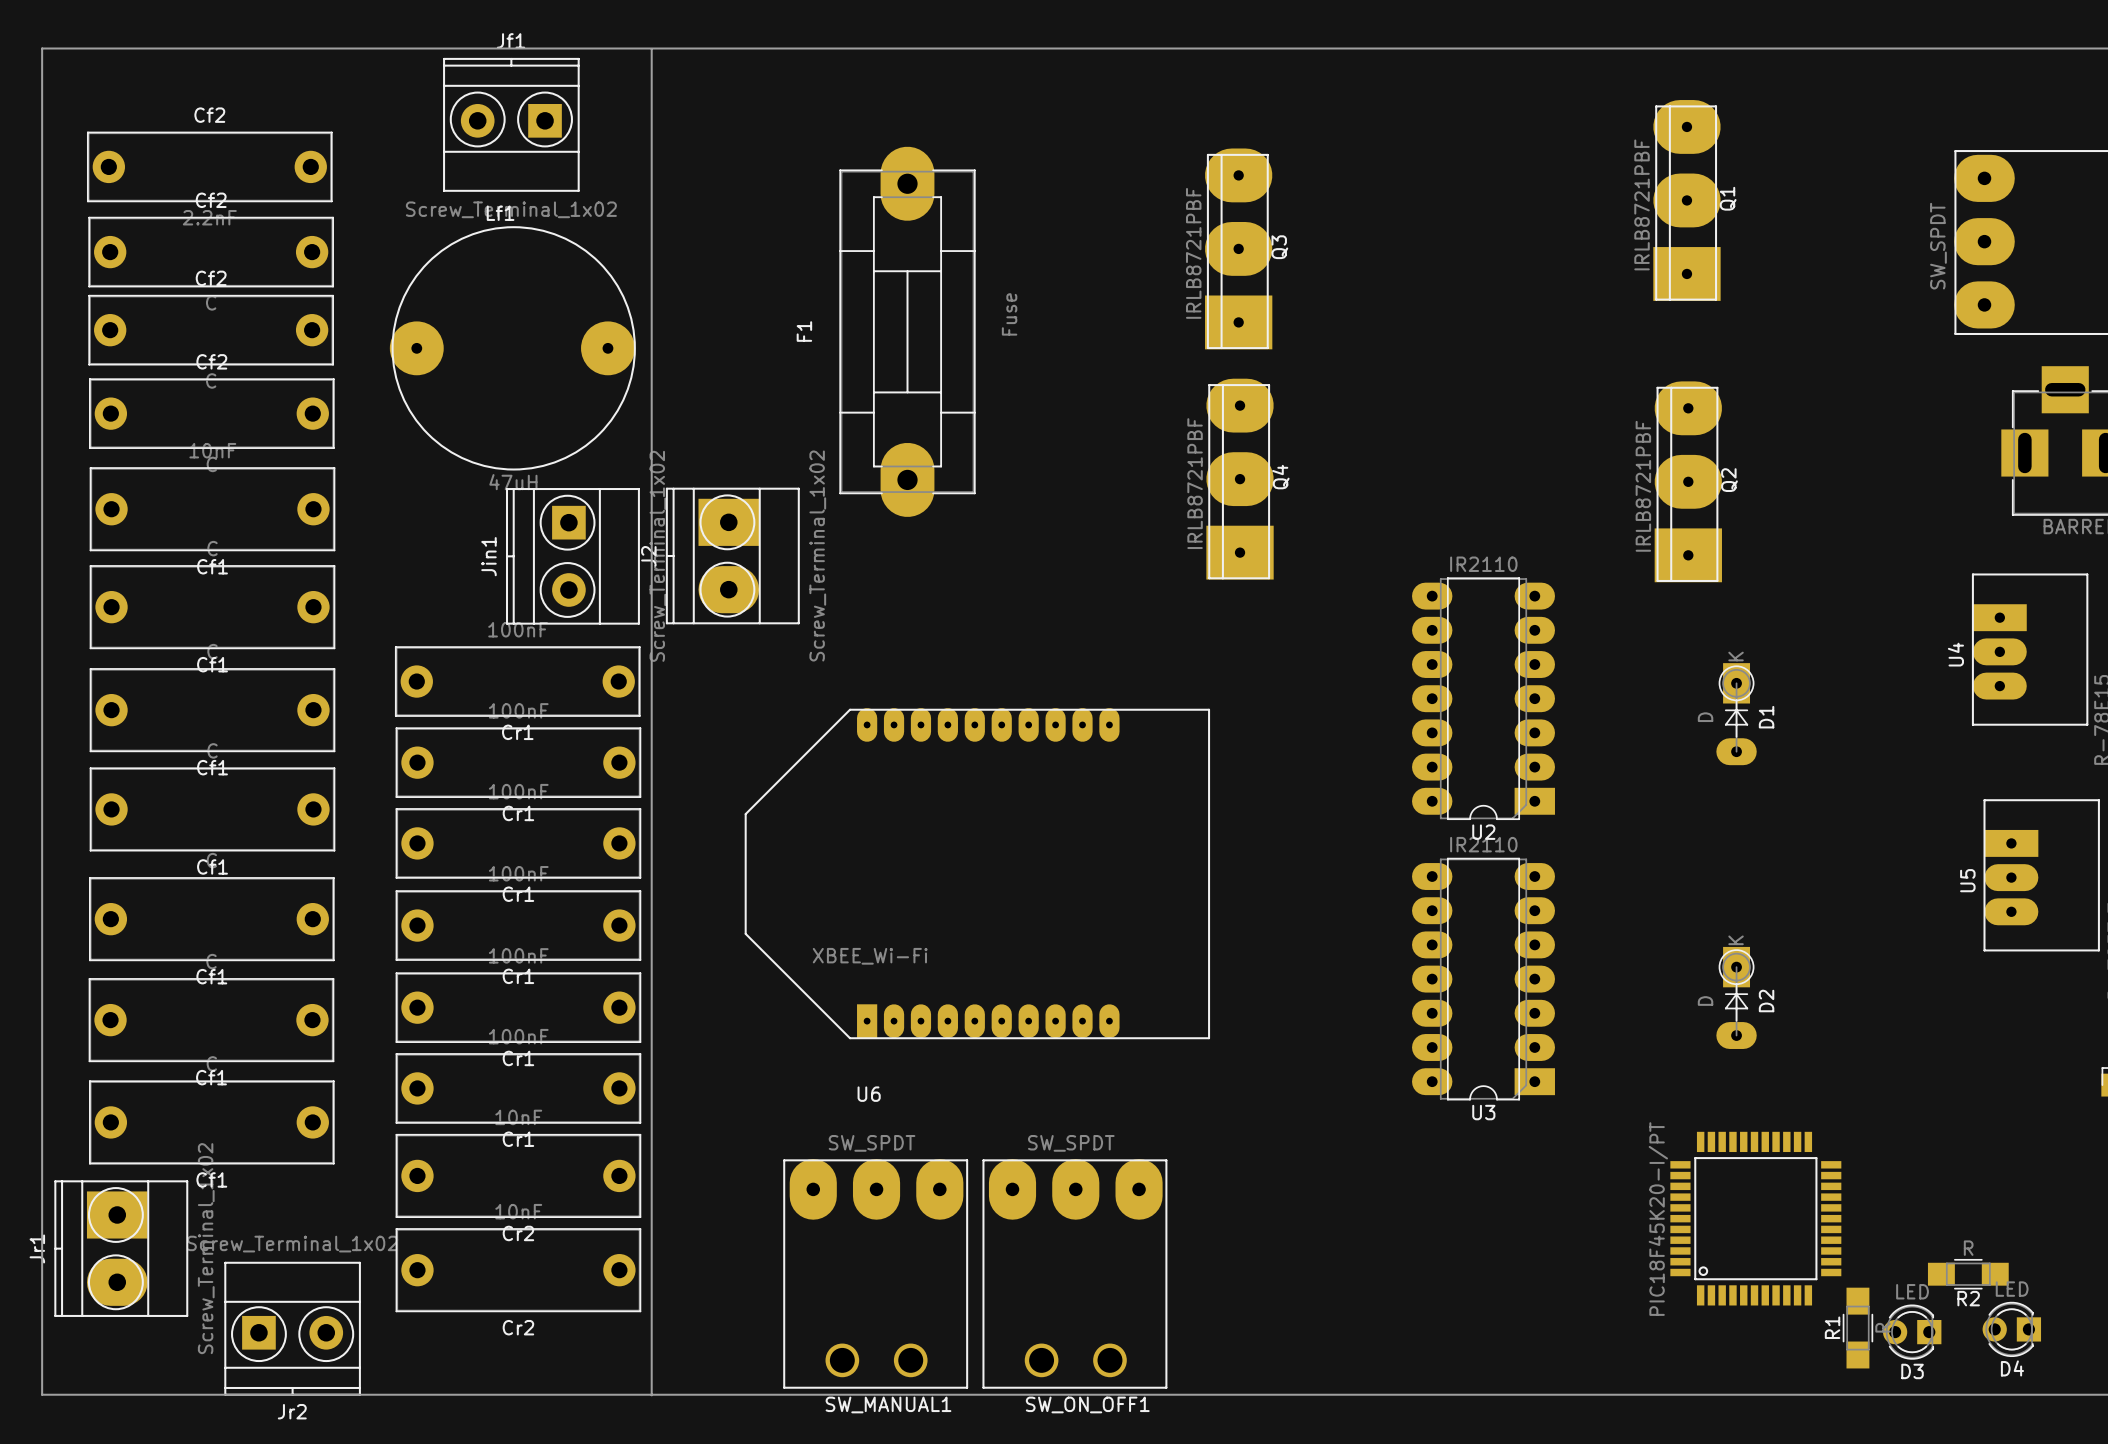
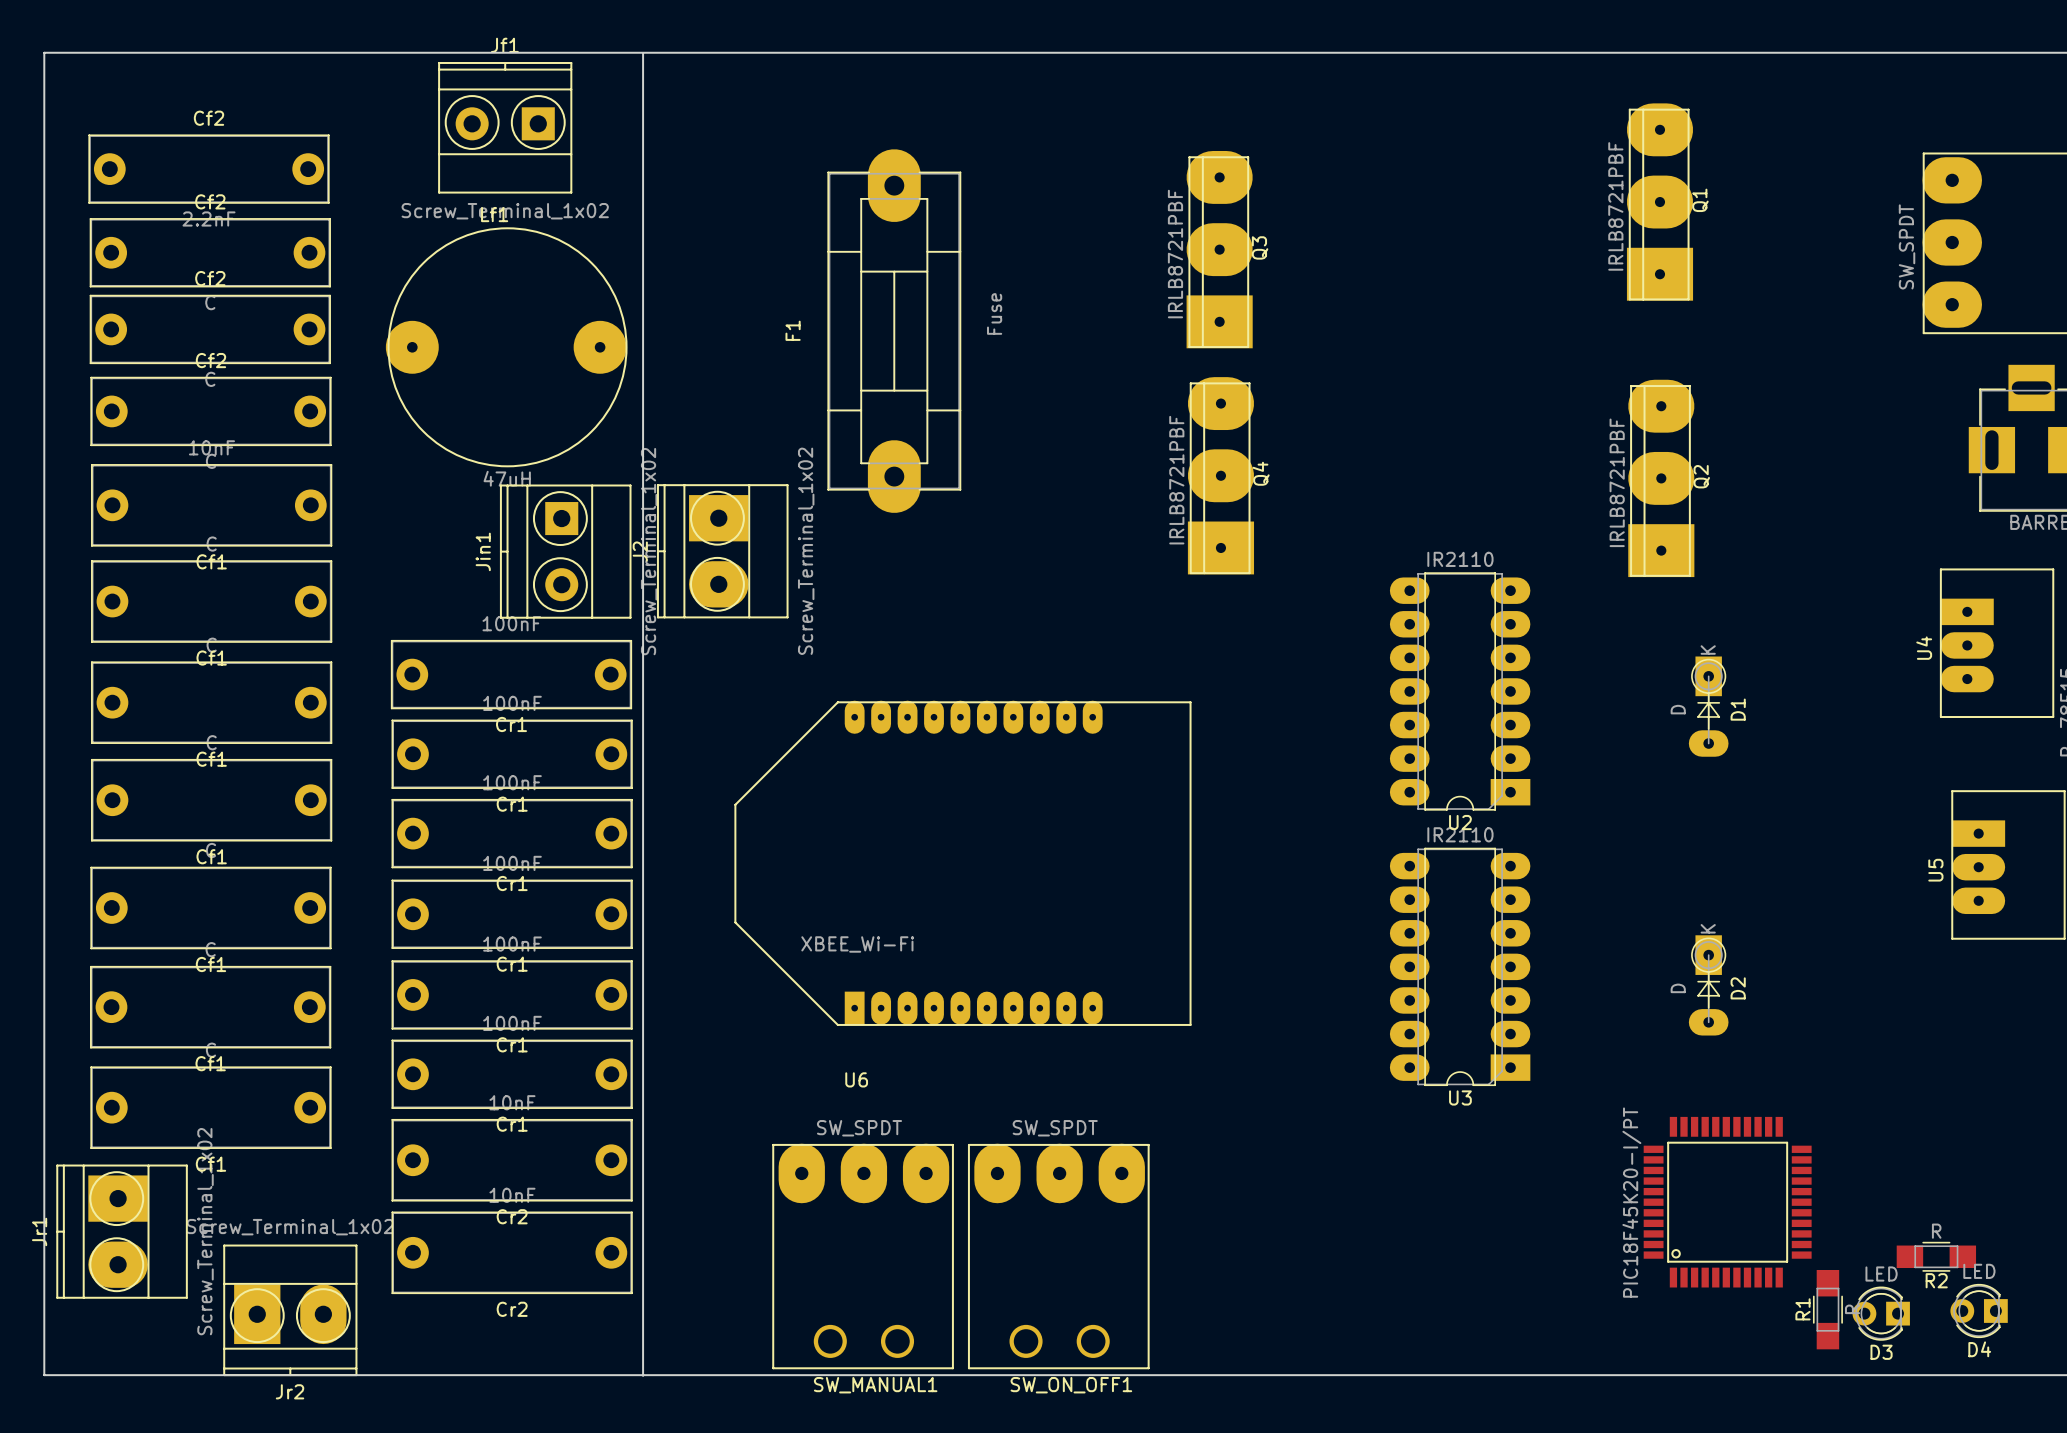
Jr2 footprint: [224, 1261, 361, 1396] -> [223, 1244, 358, 1377]

